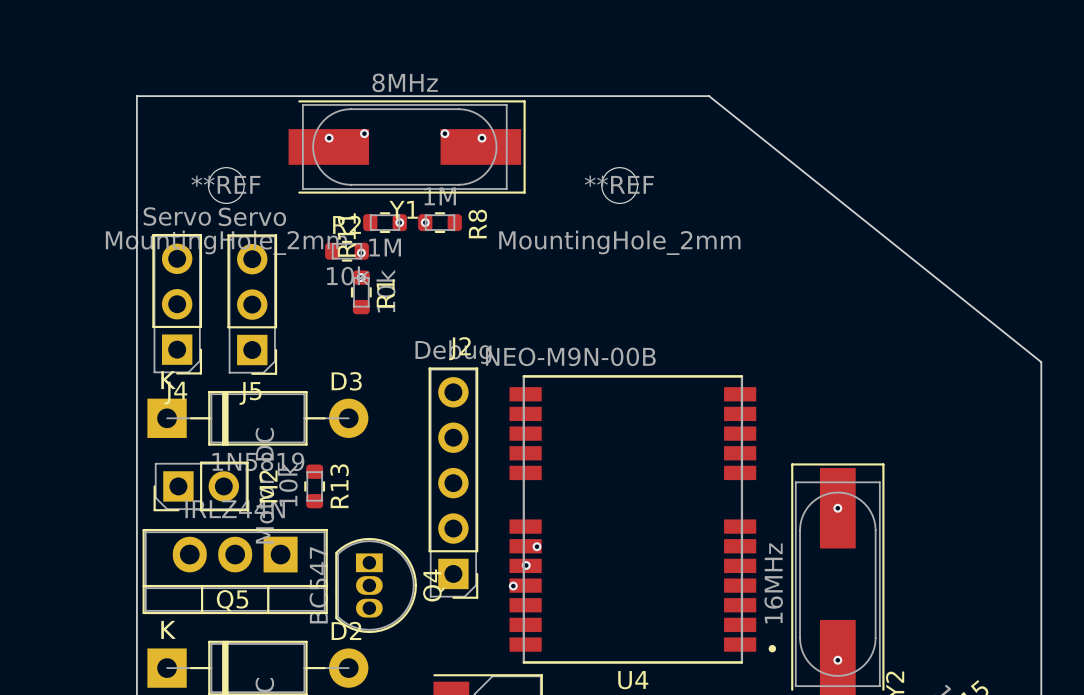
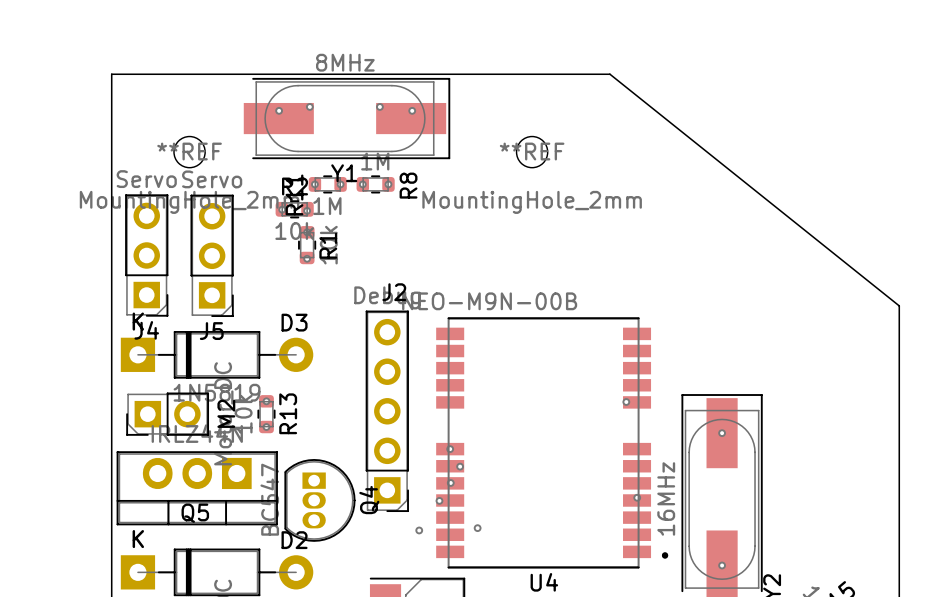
via: none -> (314, 184)
via: none -> (388, 184)
via: none -> (282, 209)
via: none -> (307, 258)
via: none -> (266, 401)
via: none -> (626, 402)
via: none -> (266, 427)
via: none -> (450, 449)
via: none -> (637, 497)
via: none -> (477, 528)
via: none -> (419, 530)

